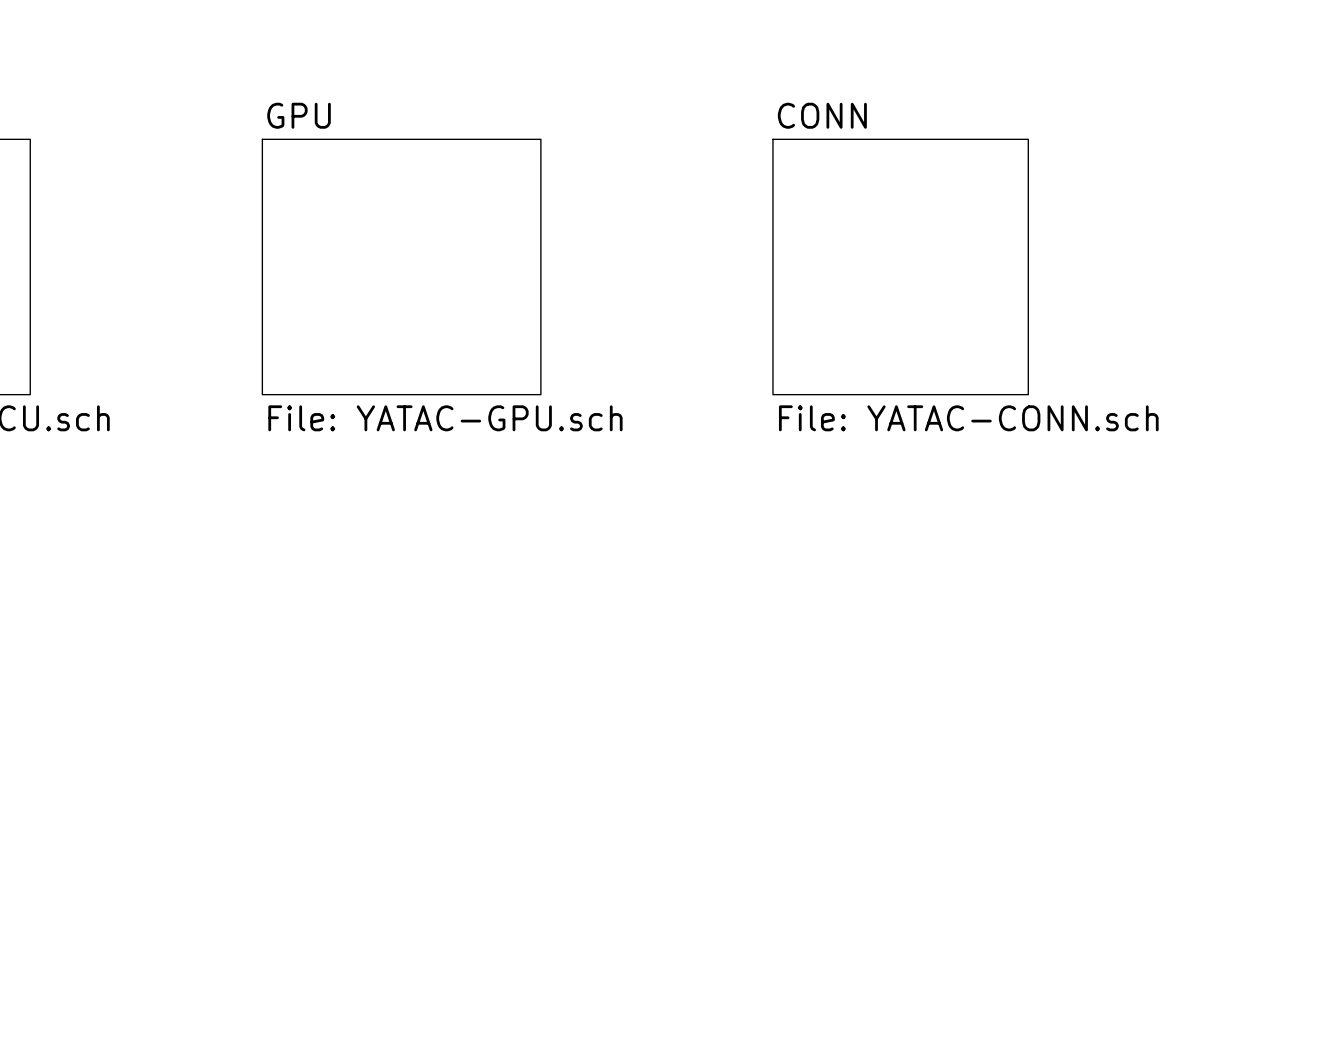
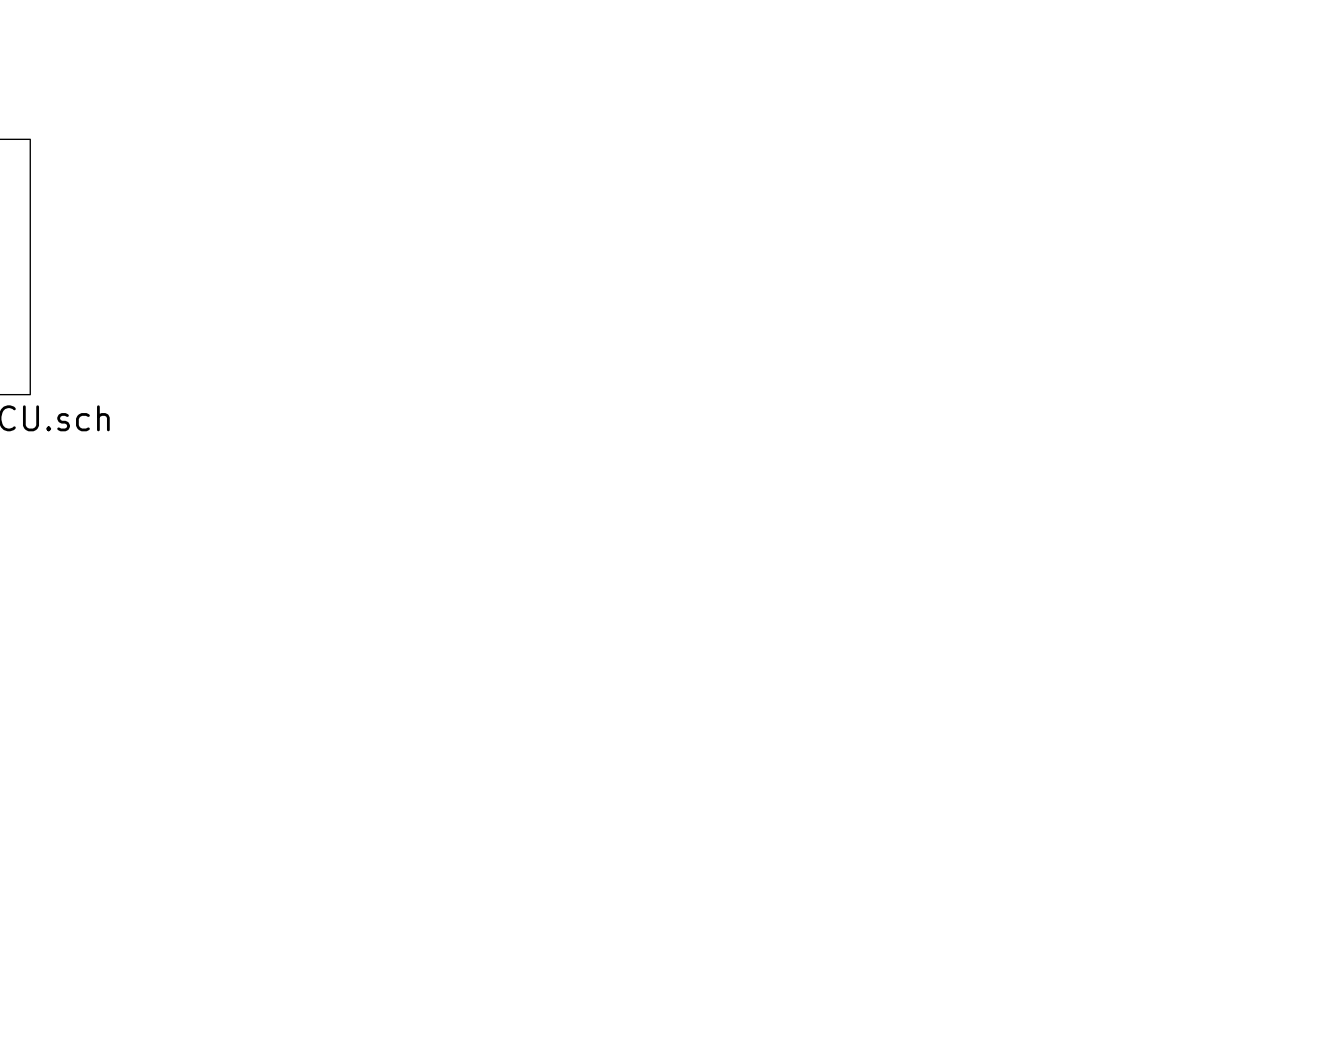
sheet GPU: File: YATAC-GPU.sch (401, 266) -> none
sheet CONN: File: YATAC-CONN.sch (900, 266) -> none

